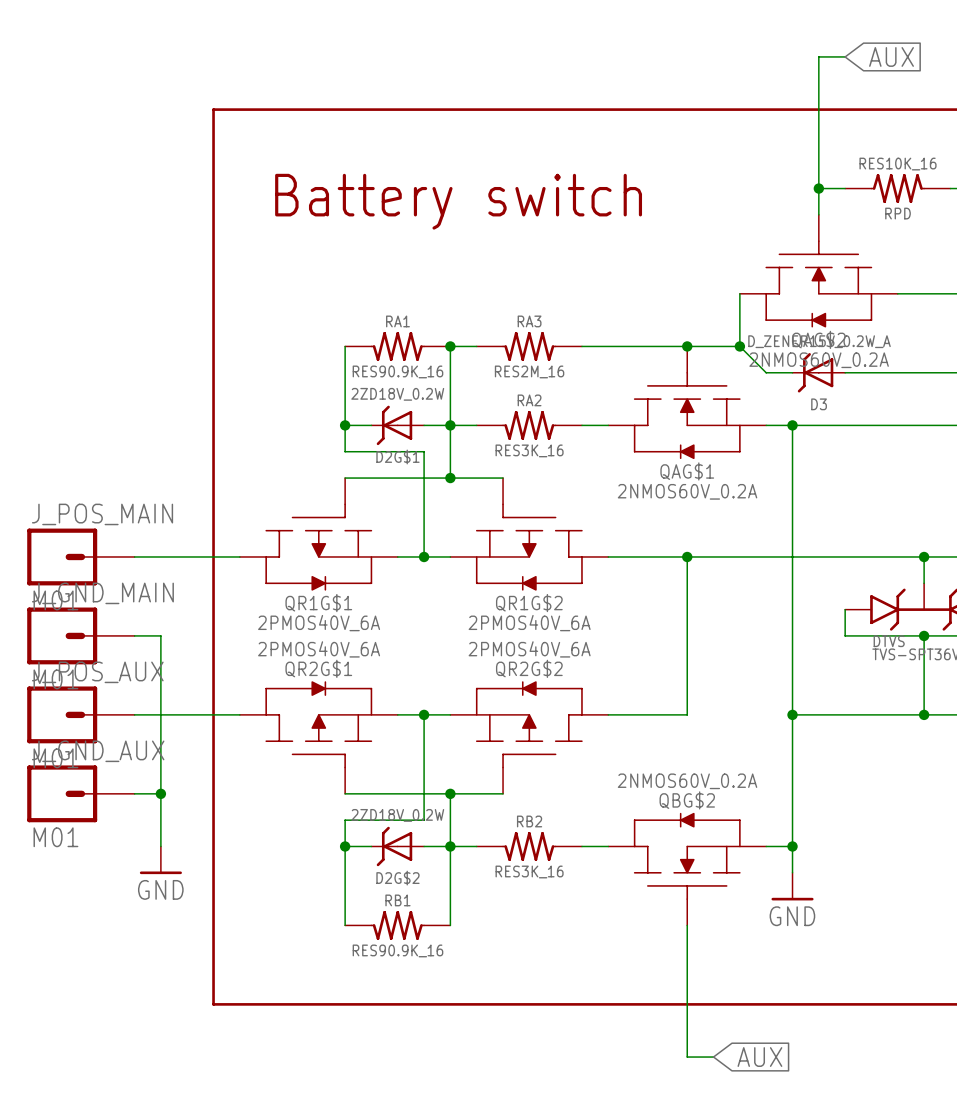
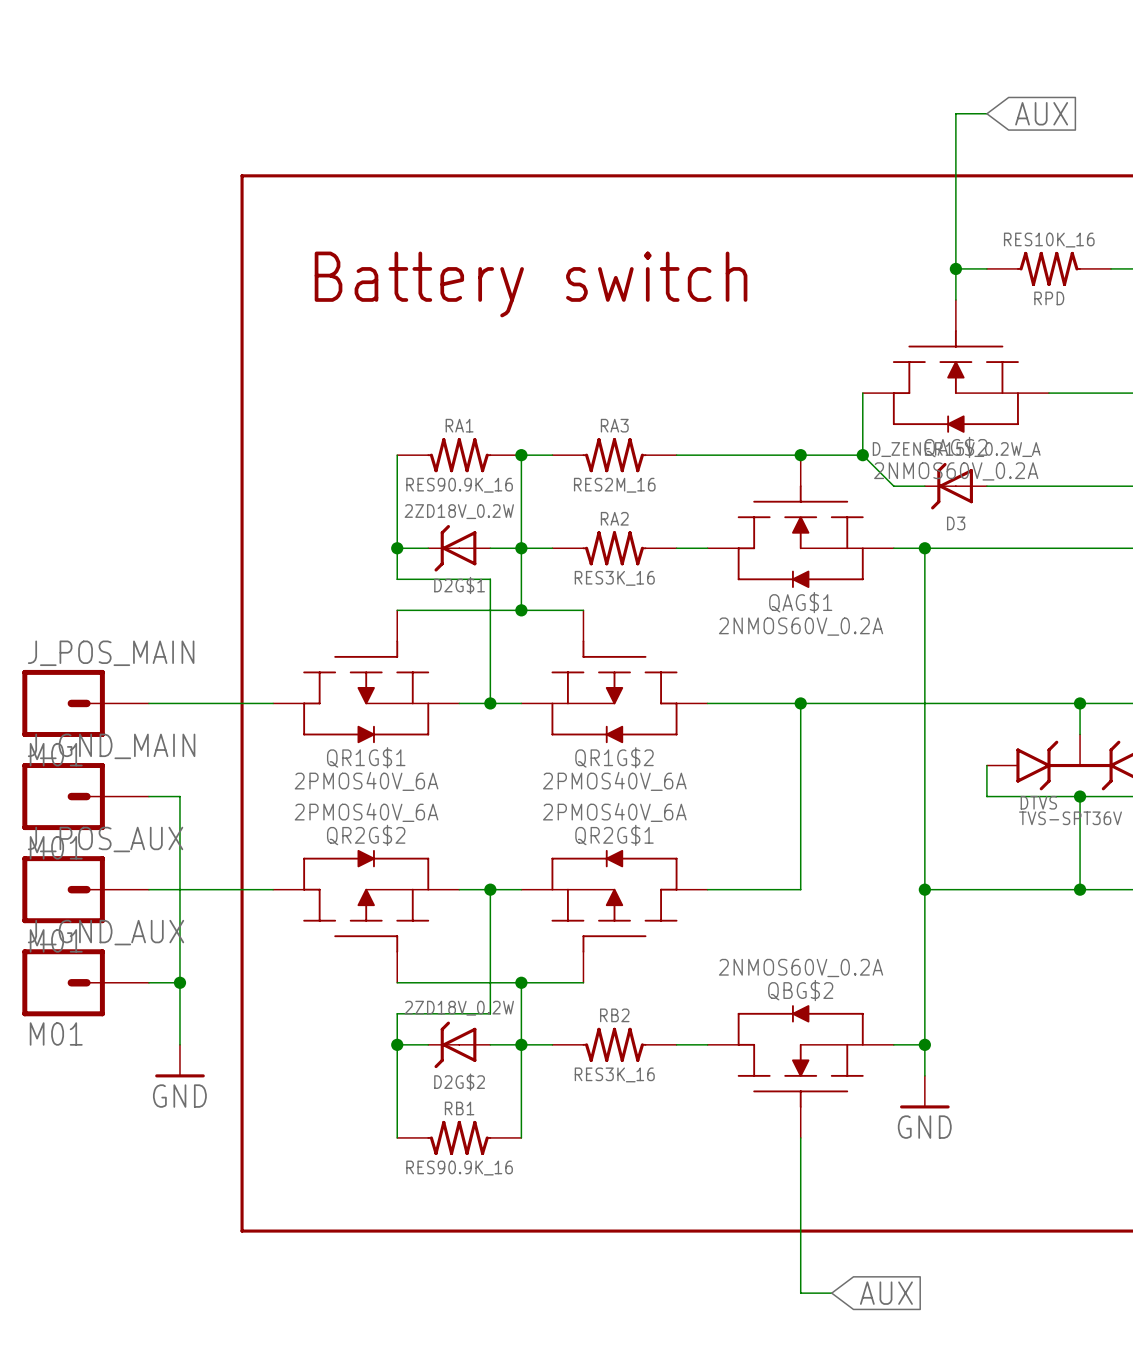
QR2G$1 name: QR2G$1 (318, 668) -> QR2G$2 (366, 835)
QR2G$2 name: QR2G$2 (529, 668) -> QR2G$1 (614, 835)

